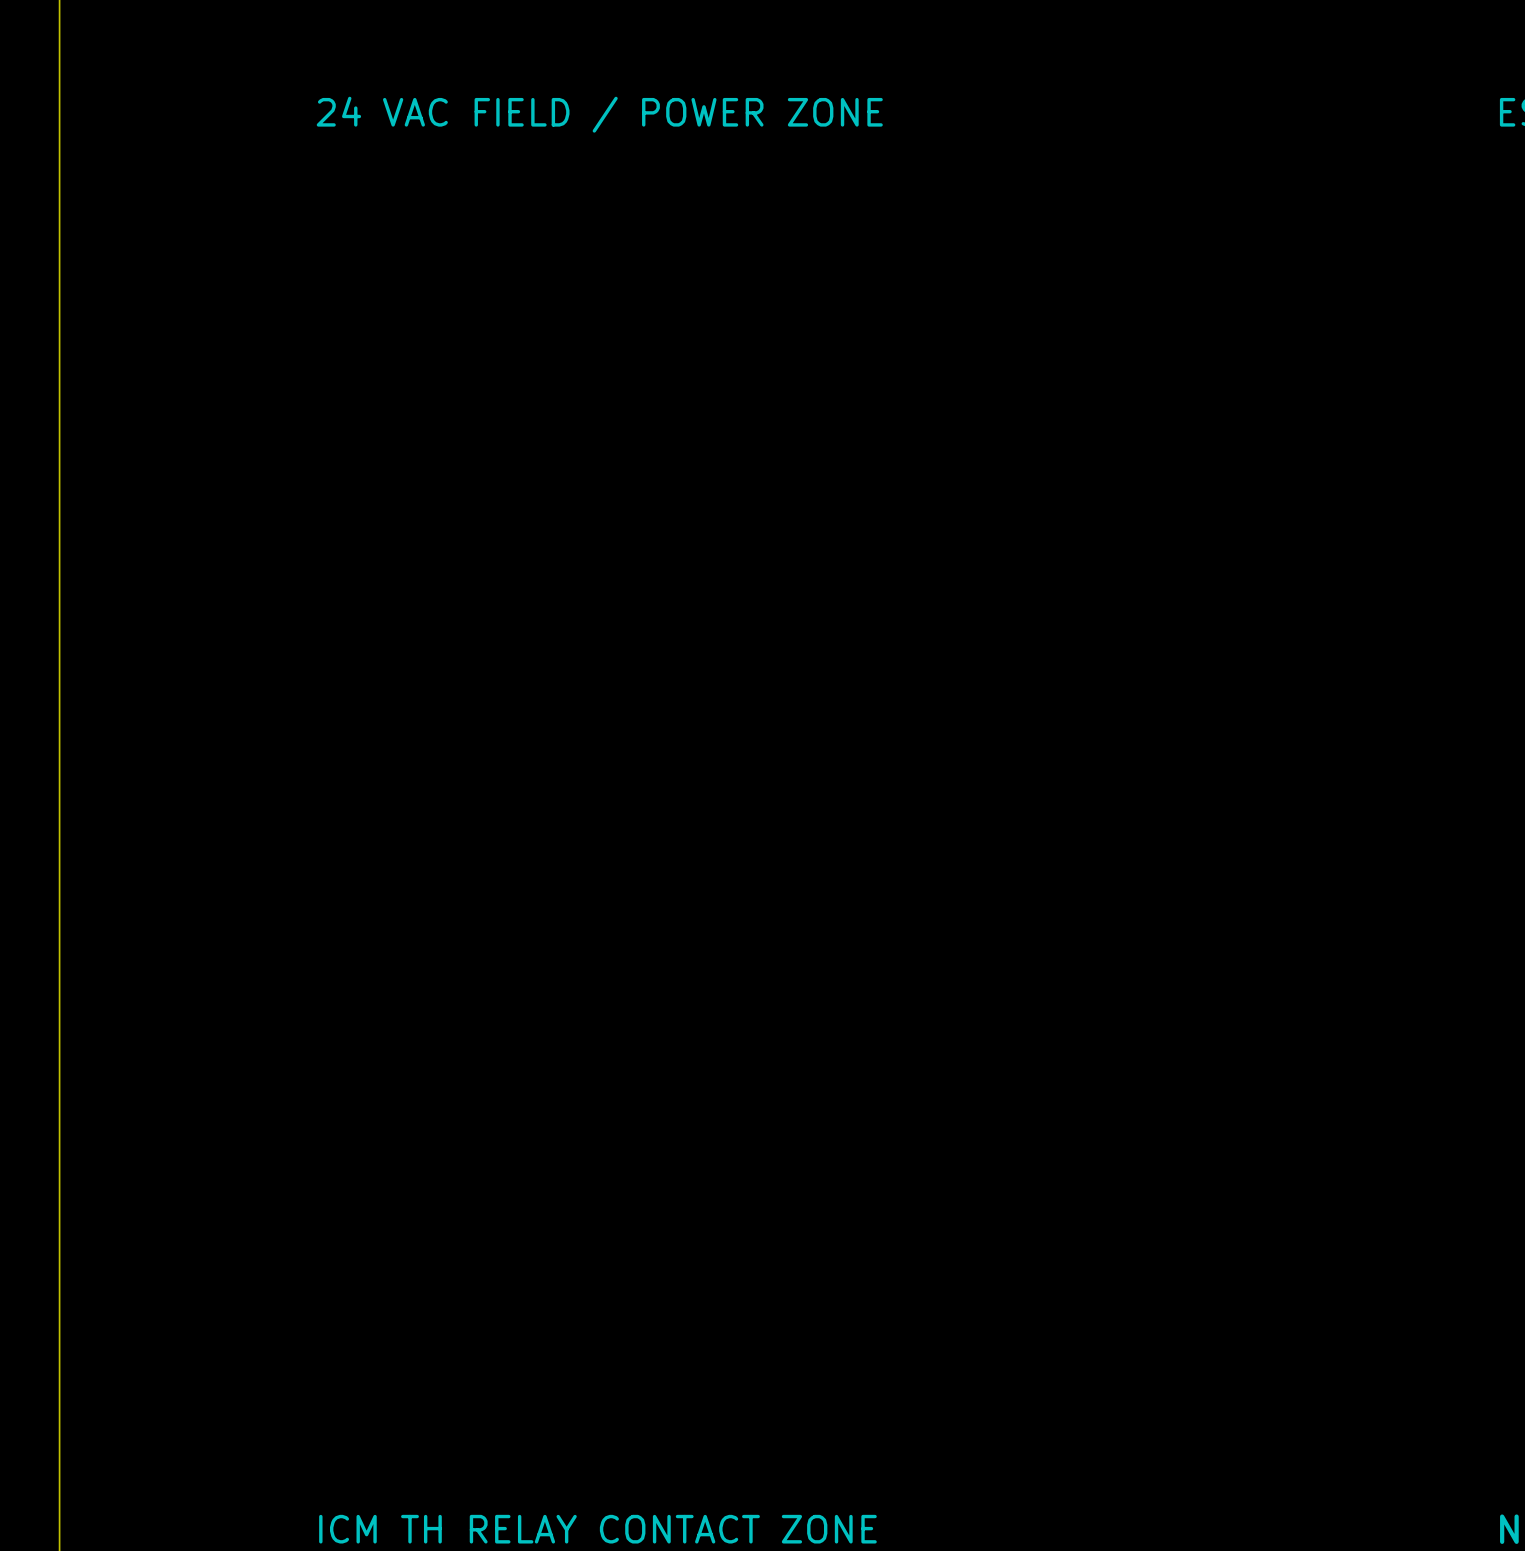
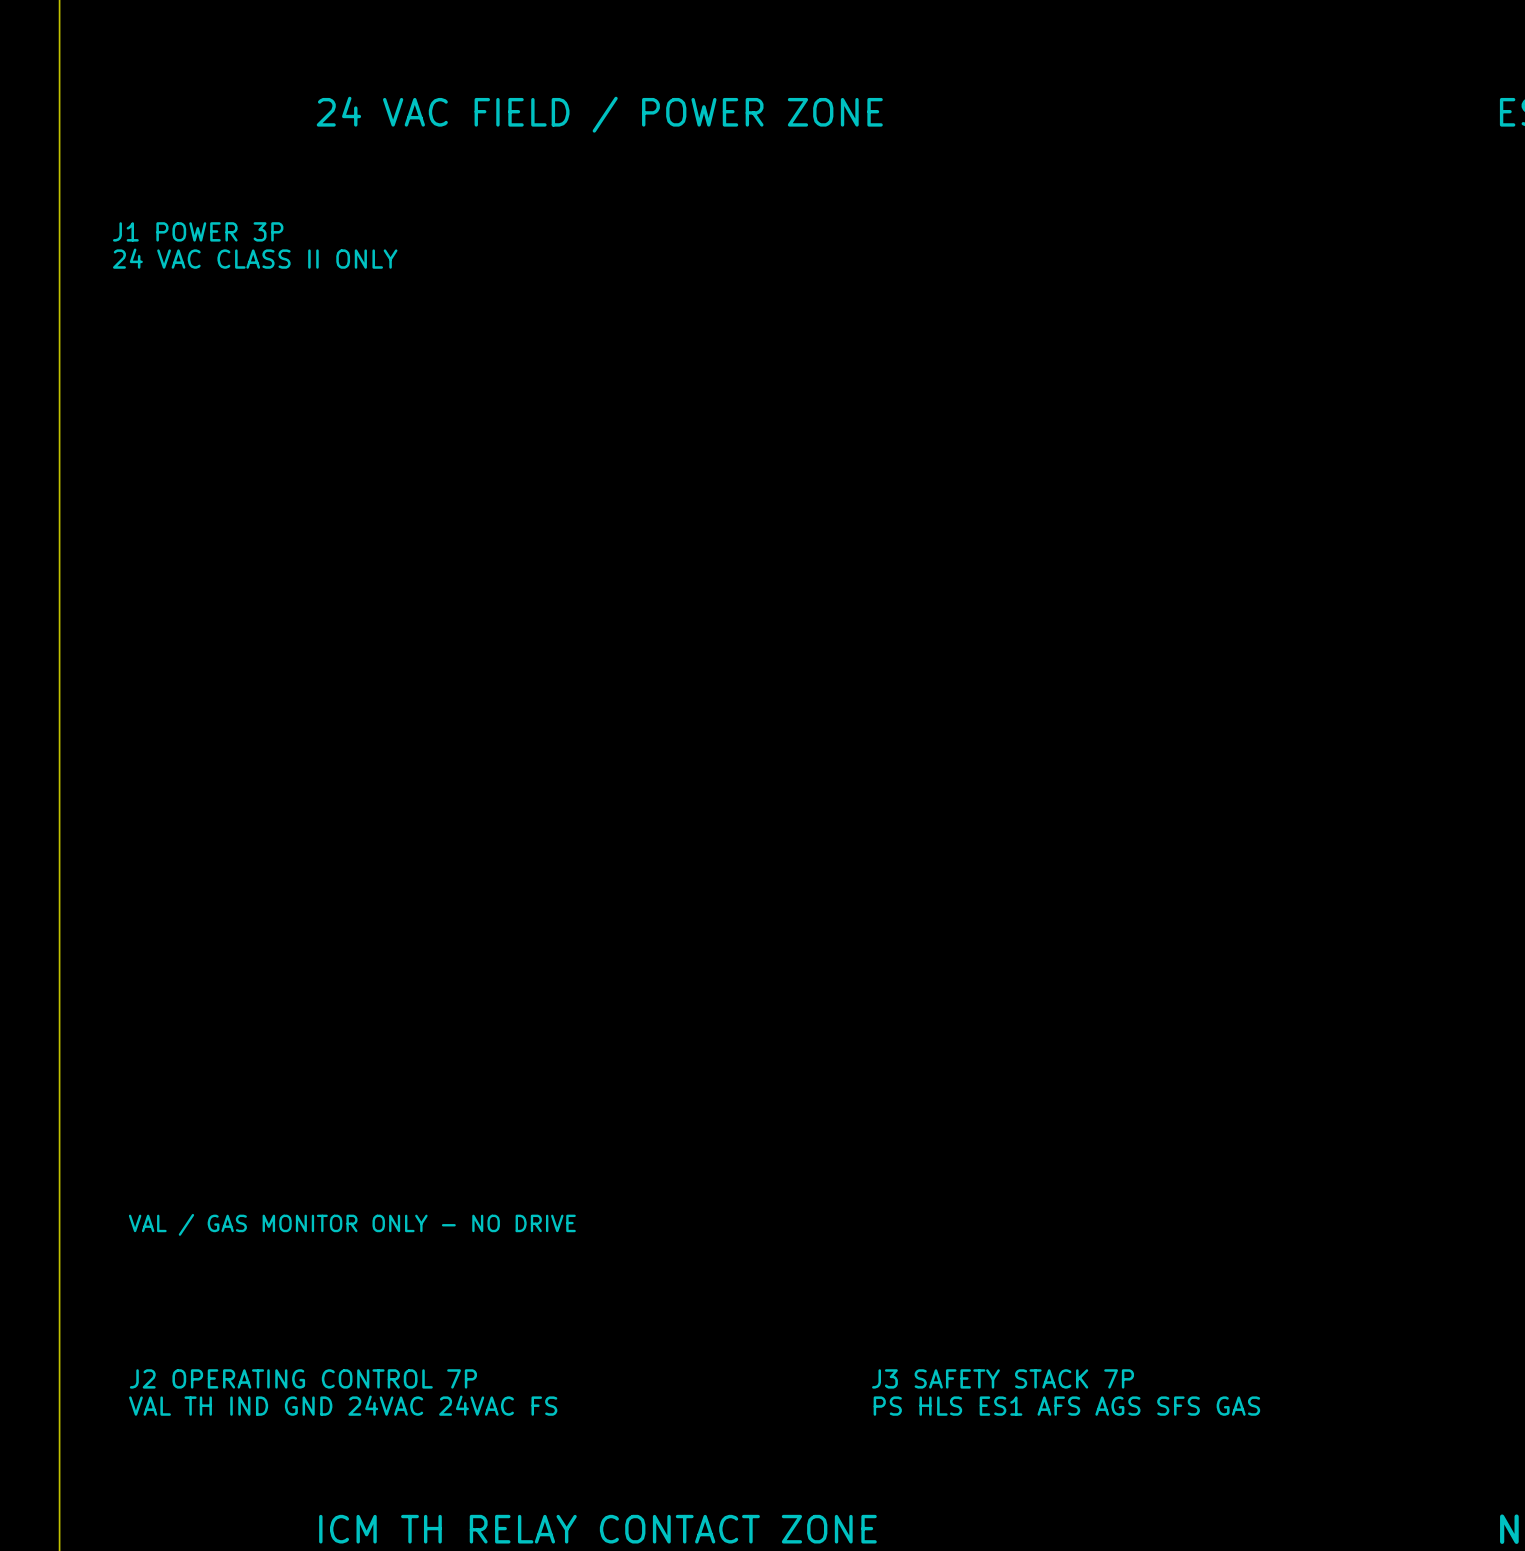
text: none -> J1 POWER 3P (198, 231)
text: none -> 24 VAC CLASS II ONLY (255, 258)
text: none -> VAL / GAS MONITOR ONLY - NO DRIVE (352, 1224)
text: none -> J2 OPERATING CONTROL 7P (303, 1378)
text: none -> J3 SAFETY STACK 7P (1003, 1378)
text: none -> VAL TH IND GND 24VAC 24VAC FS (343, 1405)
text: none -> PS HLS ES1 AFS AGS SFS GAS (1066, 1406)

